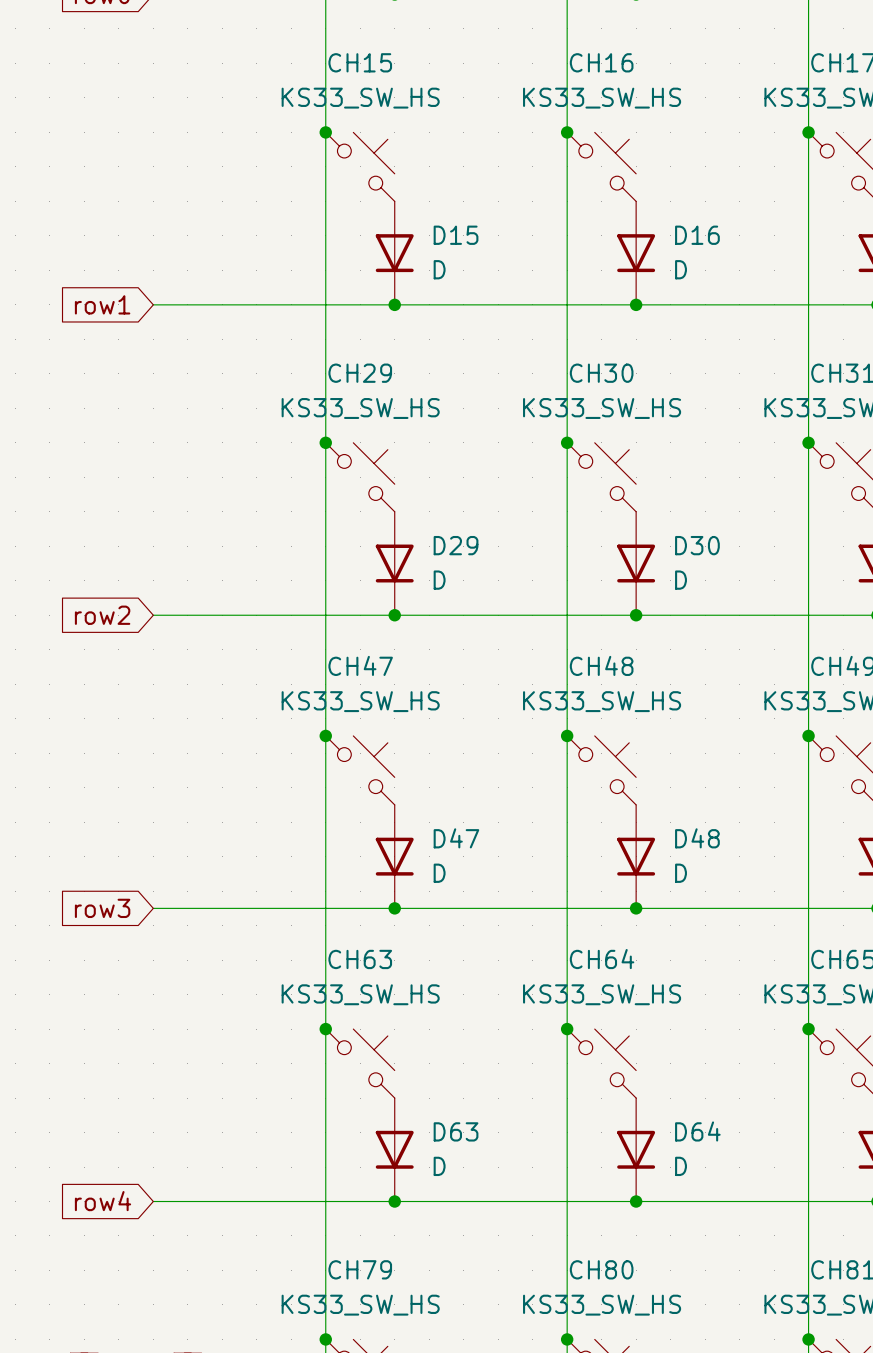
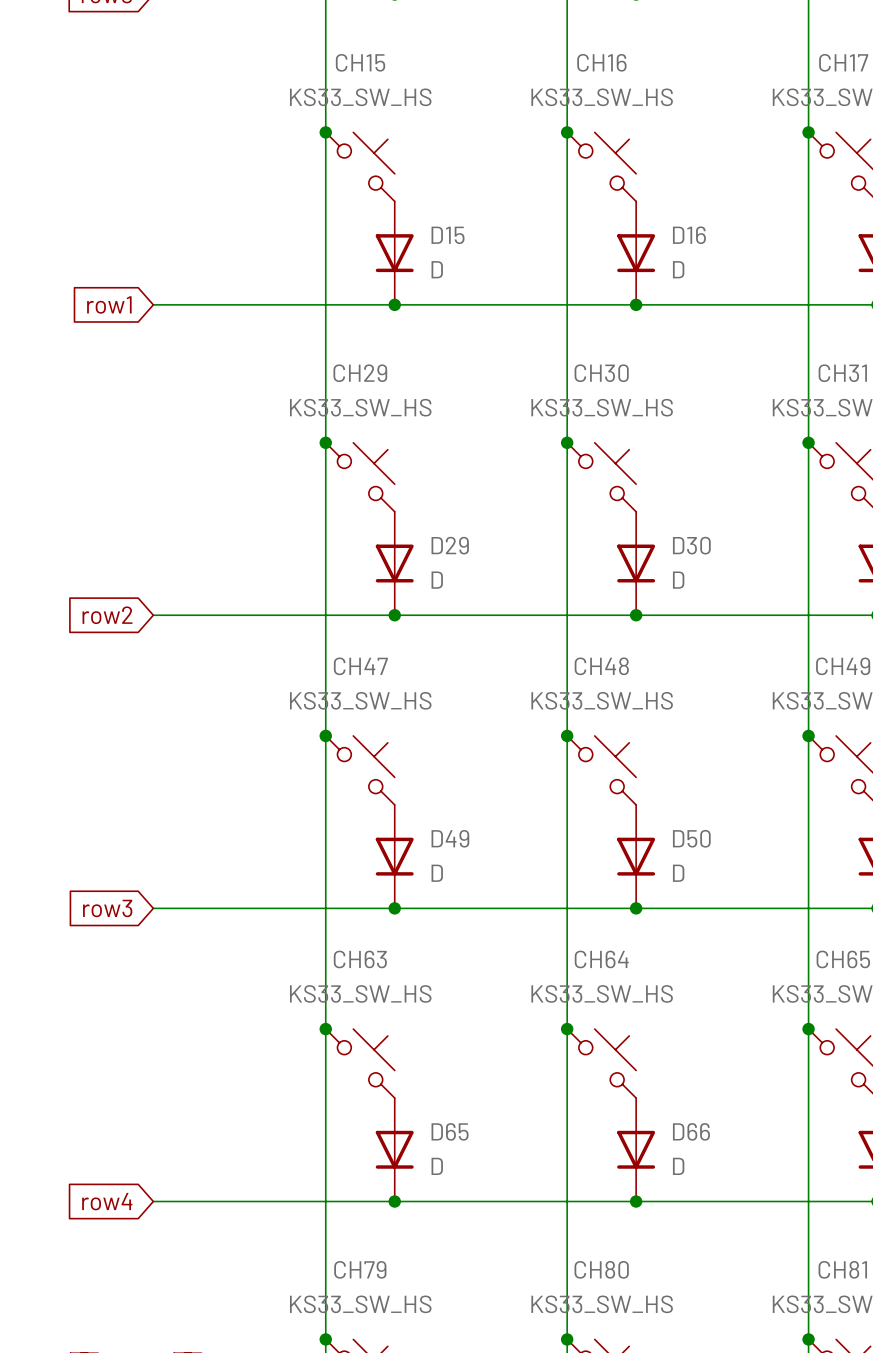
D47 name: D47 (456, 838) -> D49 (450, 838)
D48 name: D48 (697, 838) -> D50 (691, 838)
D63 name: D63 (456, 1131) -> D65 (450, 1131)
D64 name: D64 (697, 1131) -> D66 (691, 1131)

